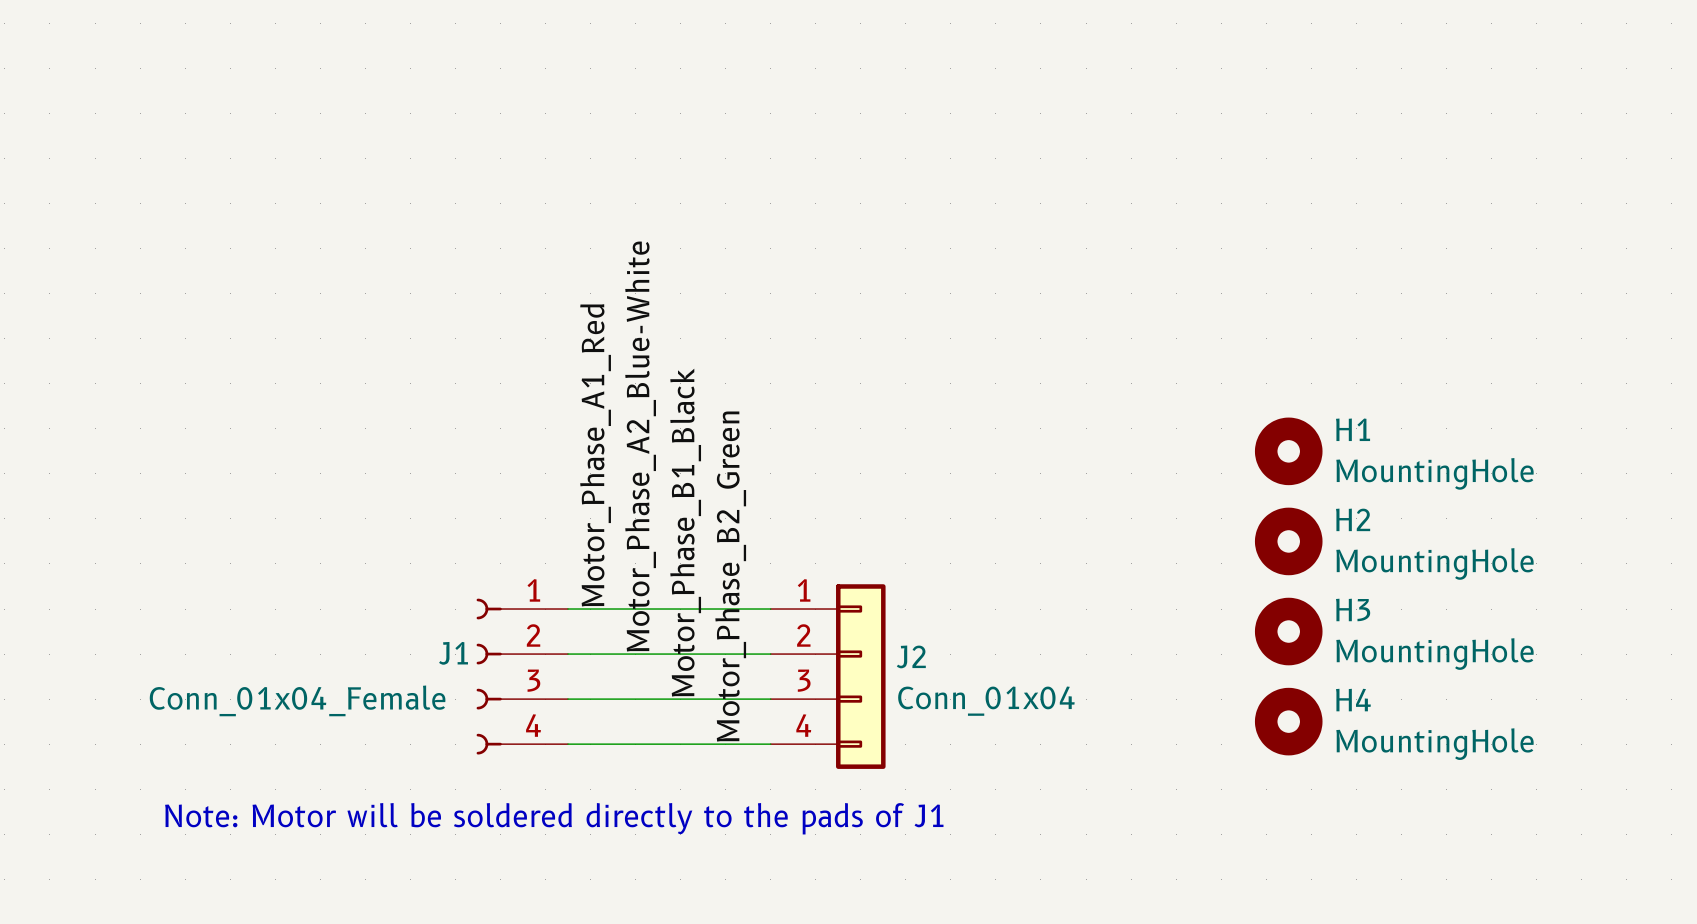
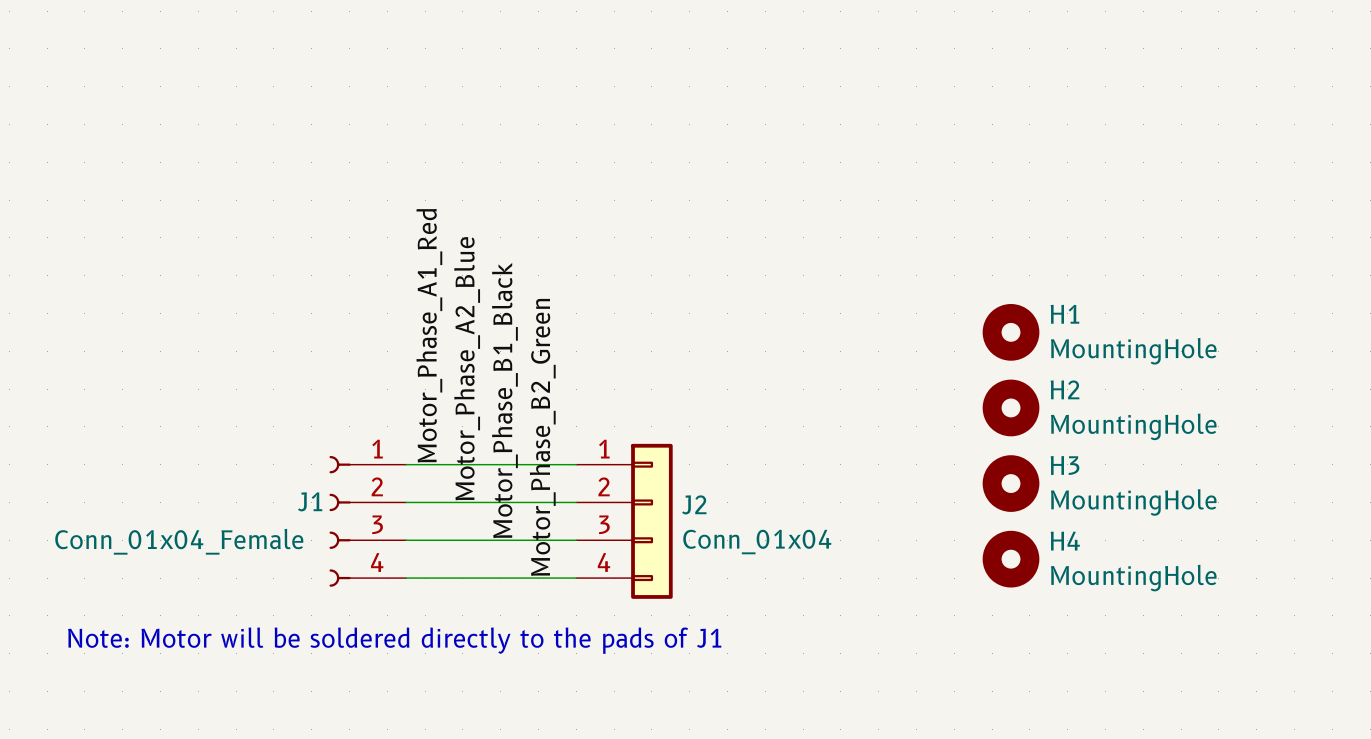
label: Motor_Phase_A2_Blue-White (640, 446) -> Motor_Phase_A2_Blue (467, 368)

